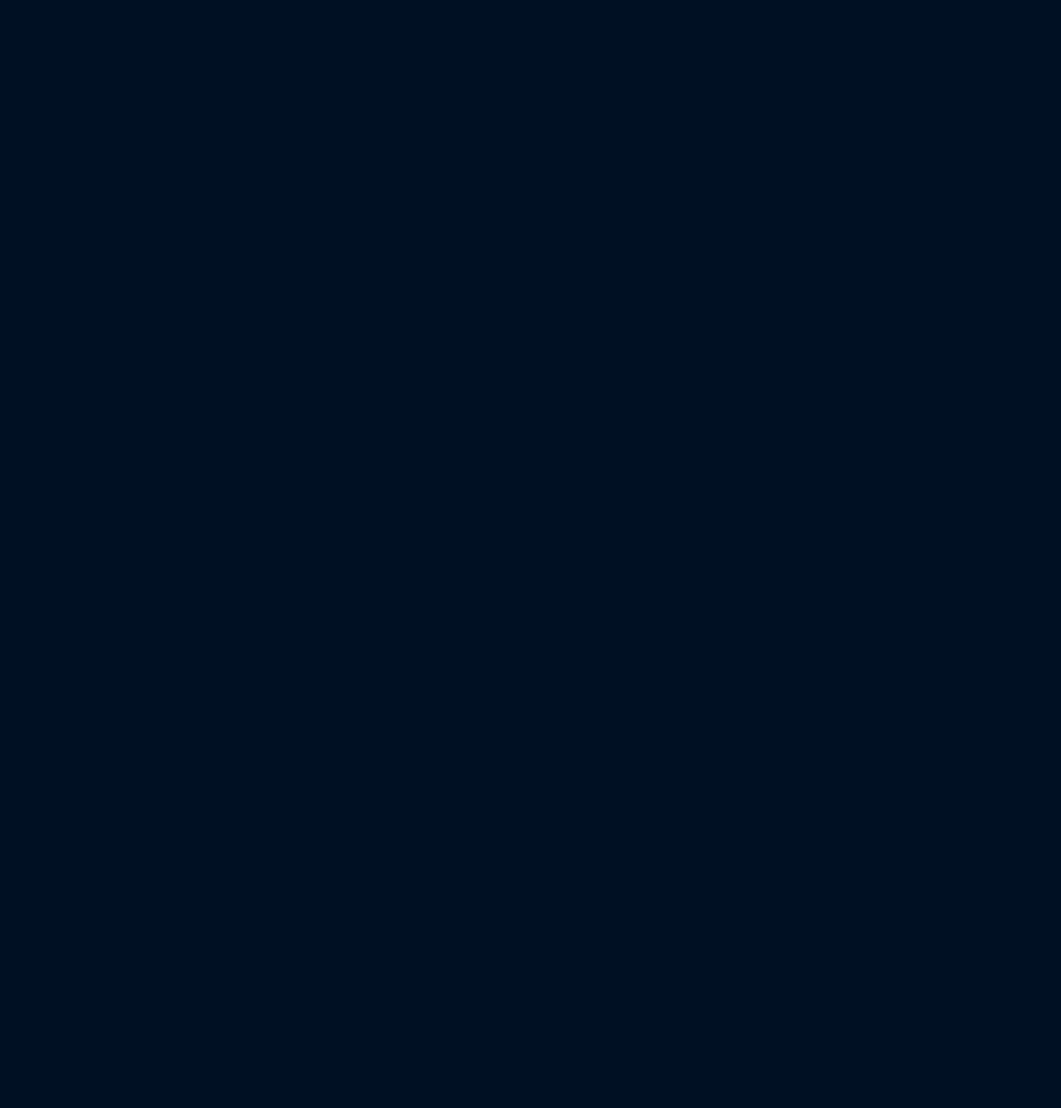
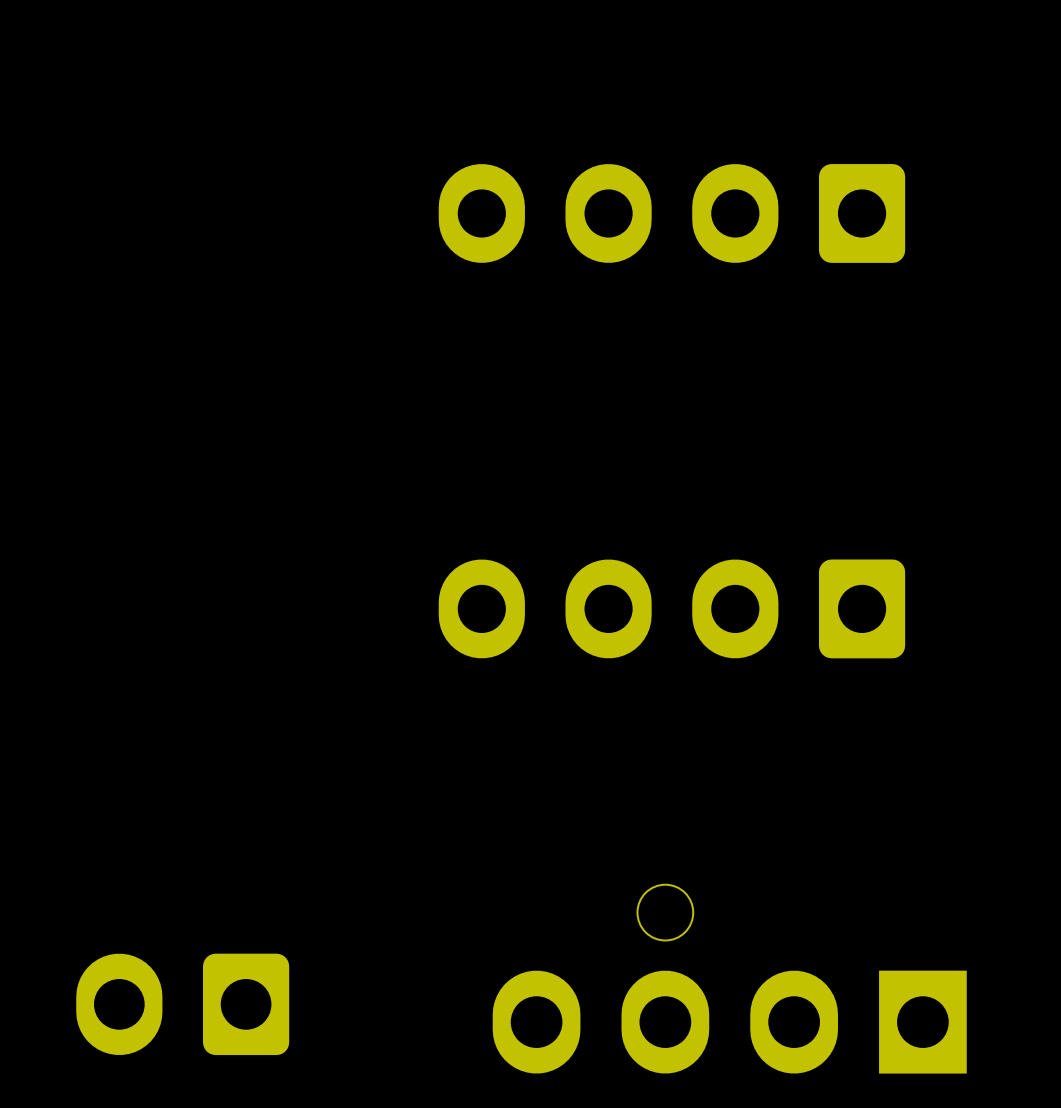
part: none -> (671, 213)
part: none -> (671, 608)
part: none -> (729, 979)
part: none -> (182, 1004)

